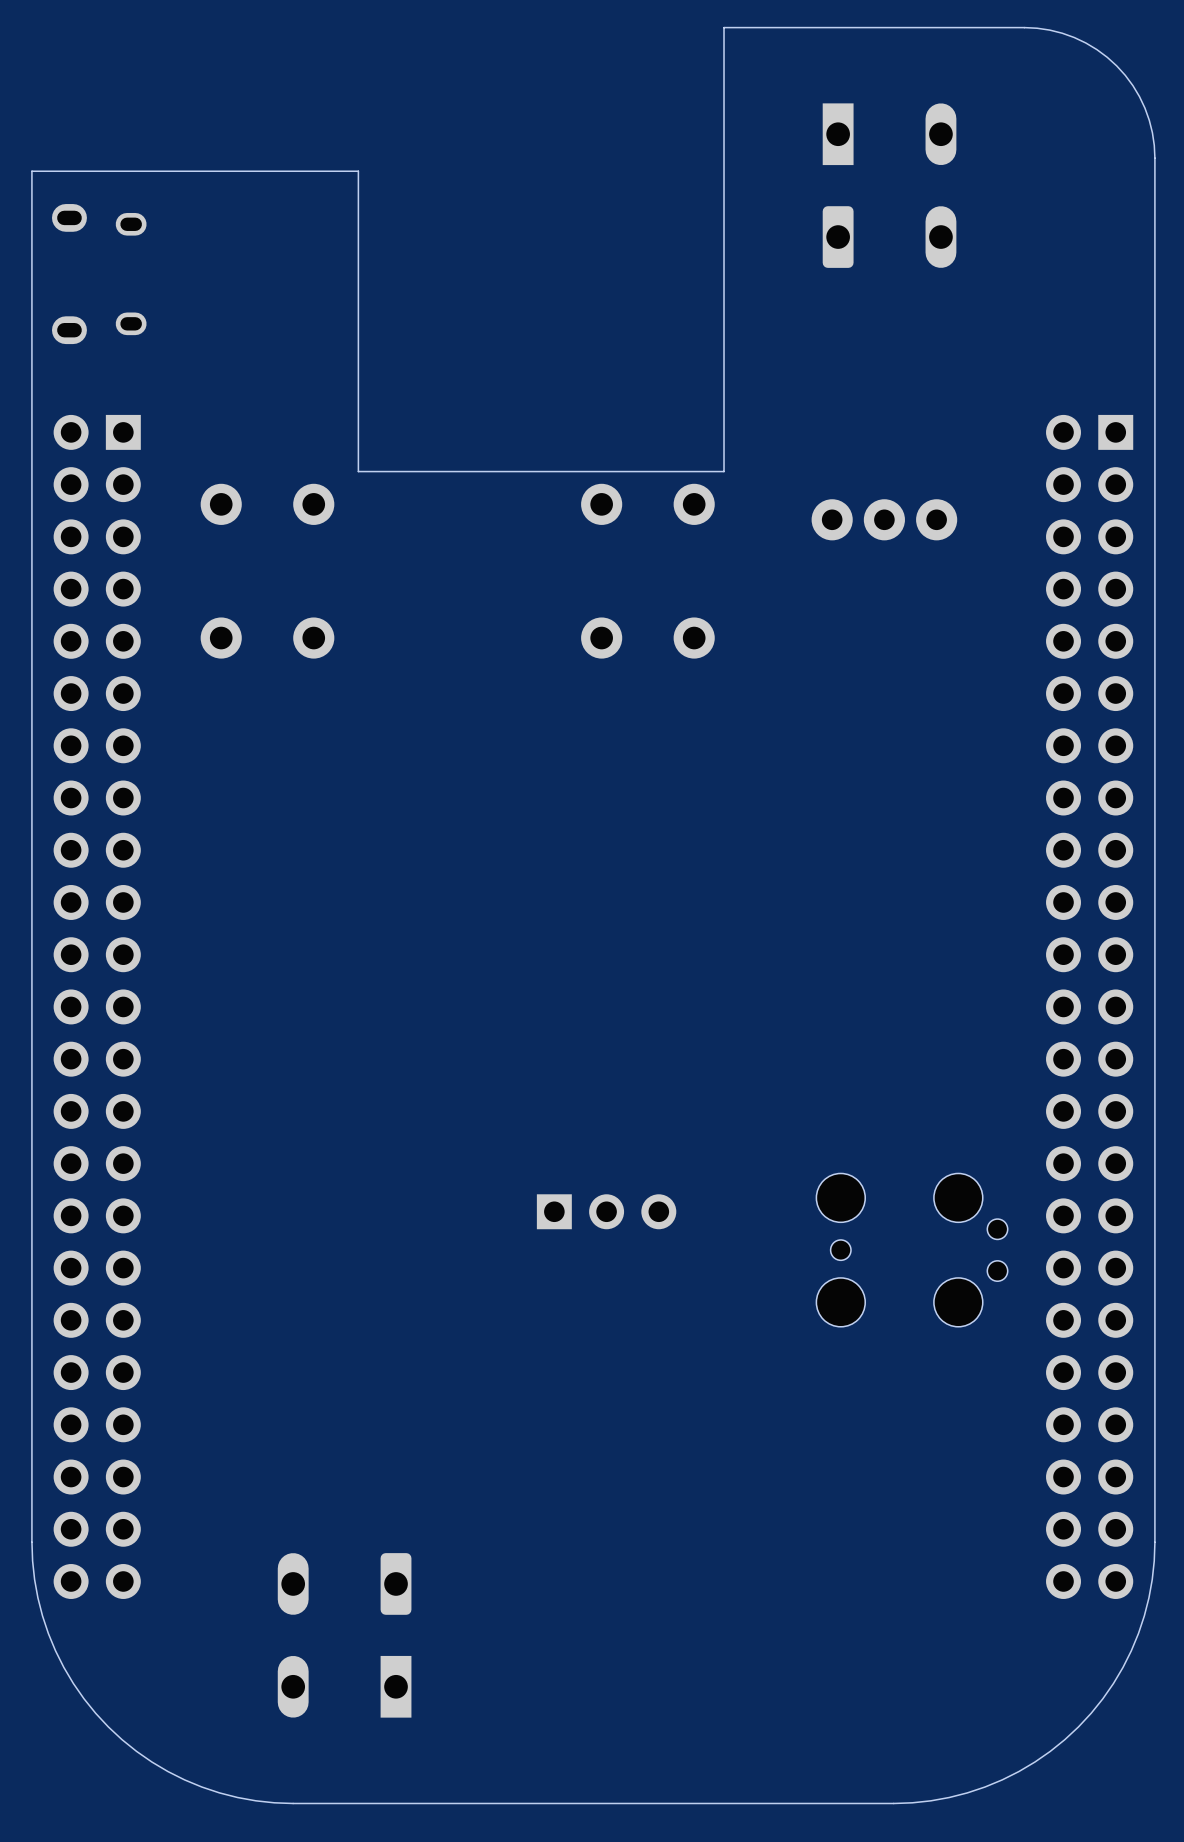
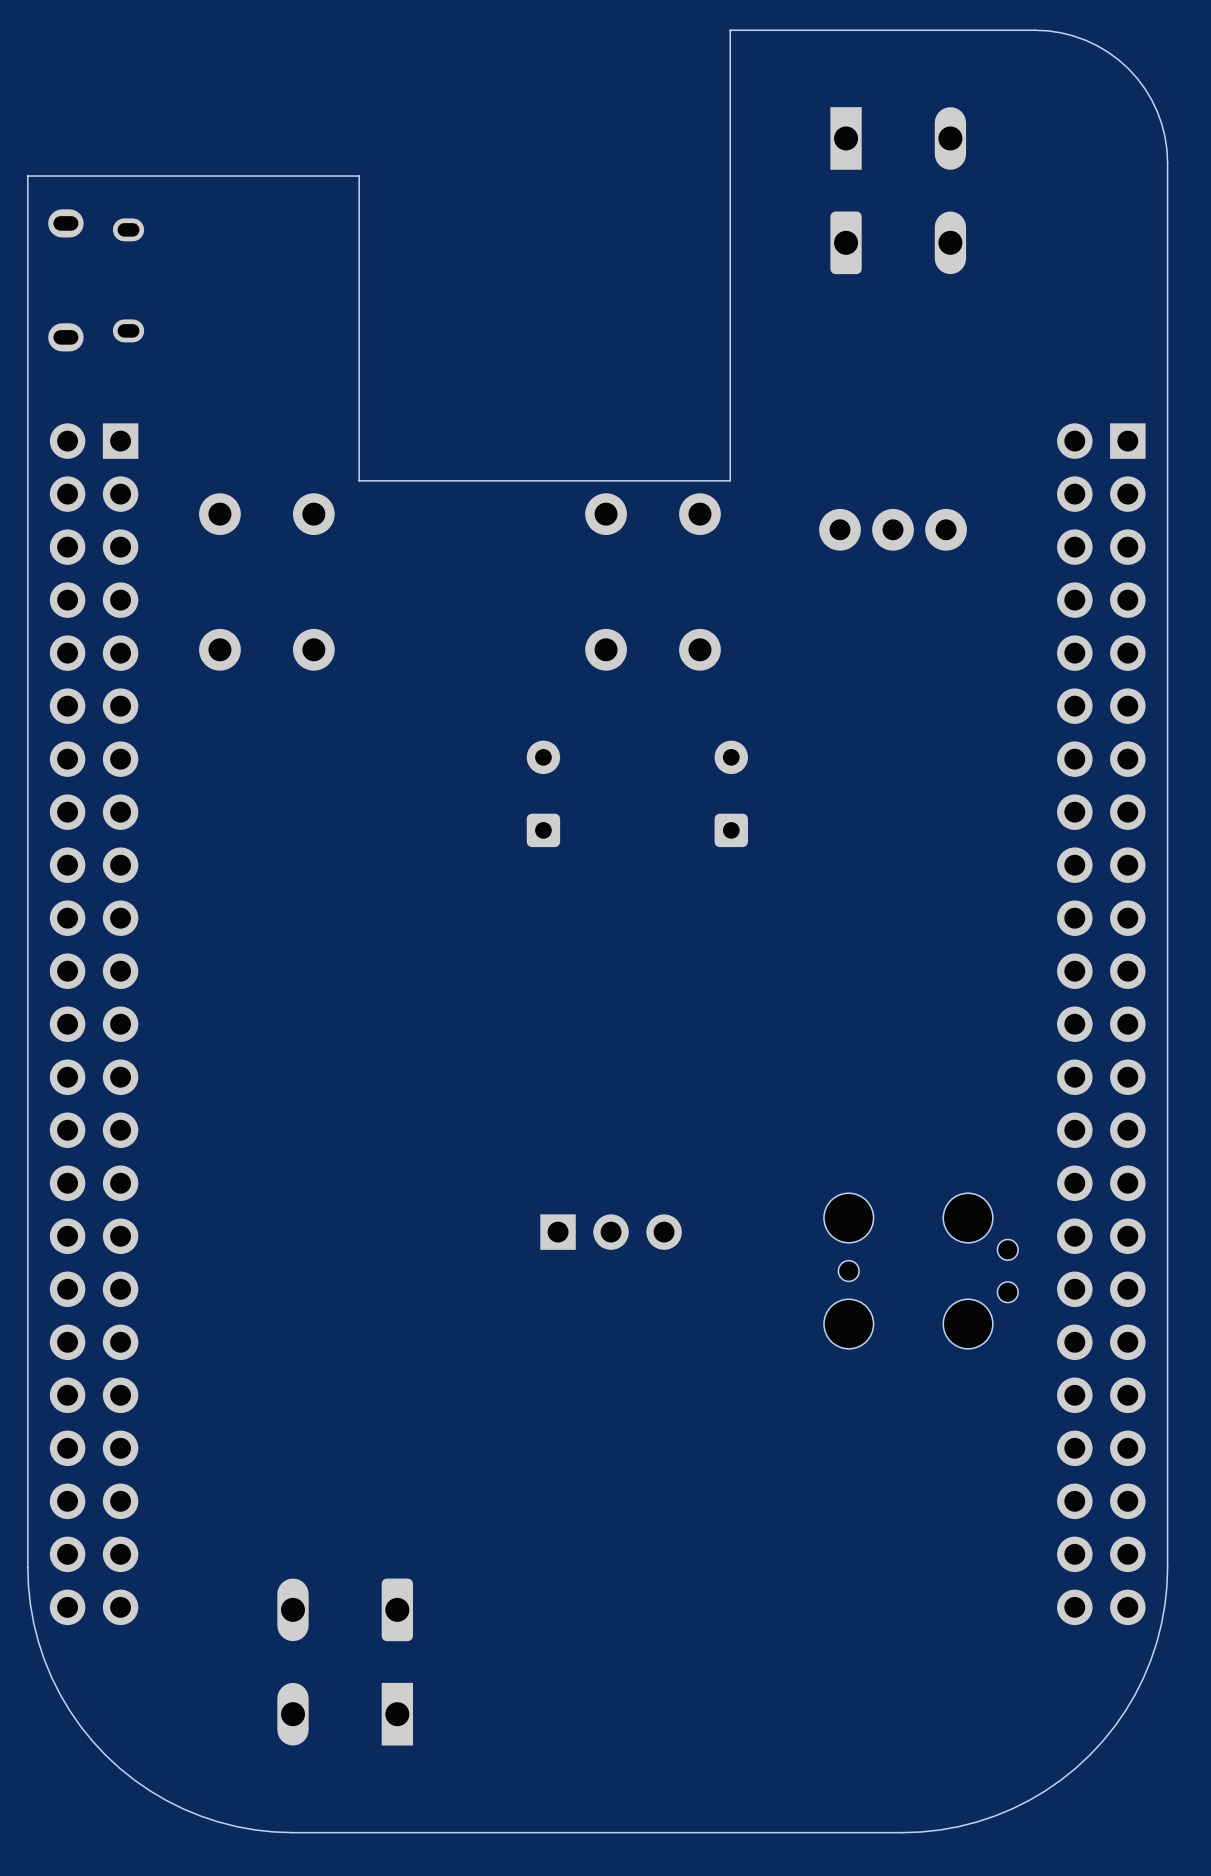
part: none -> (543, 793)
part: none -> (731, 793)

